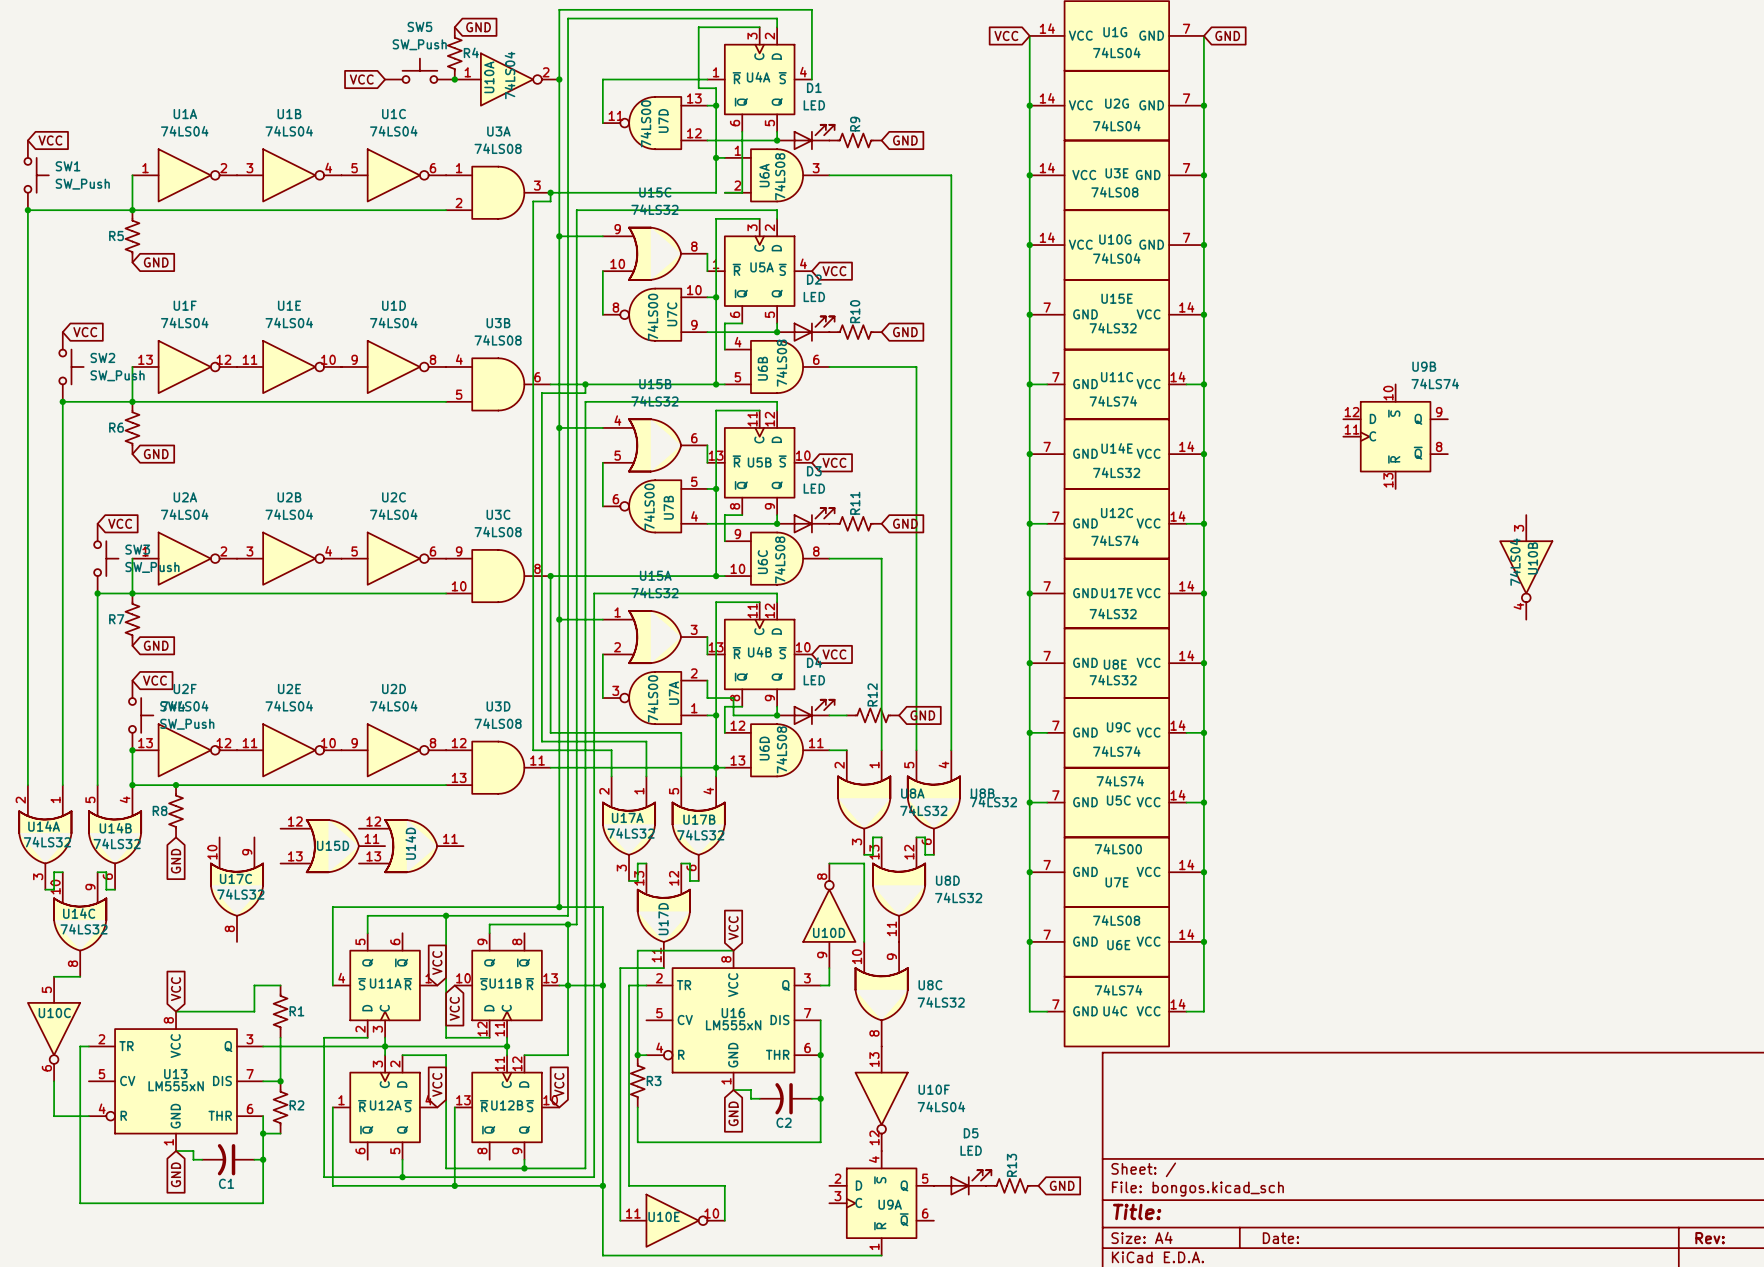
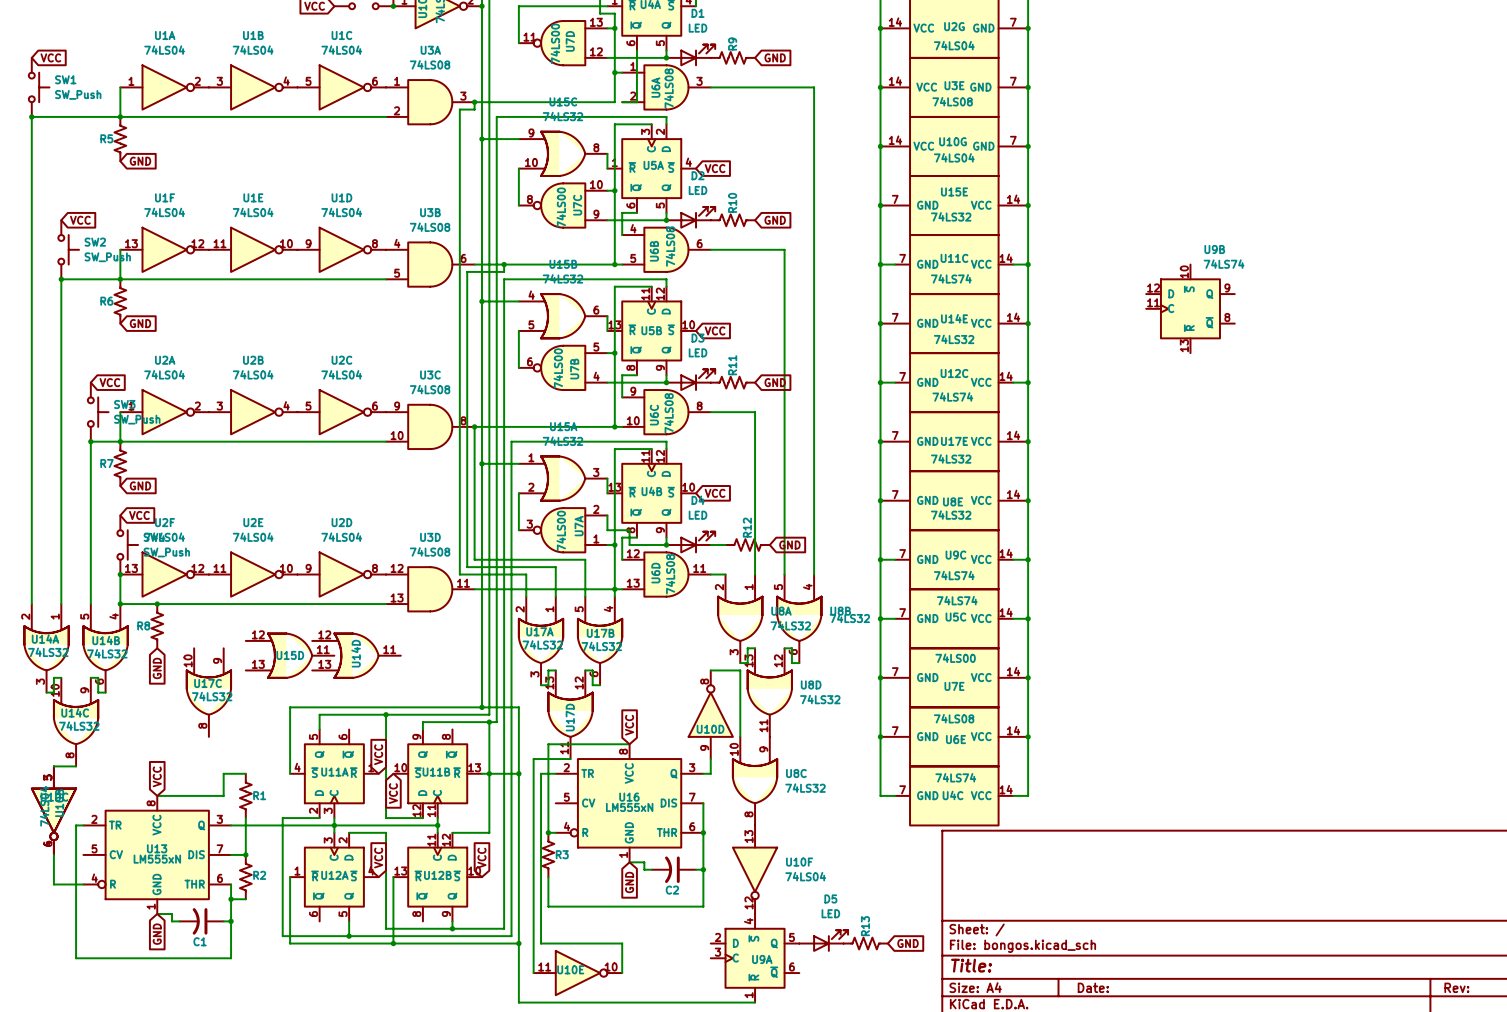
U10B position: (1526, 567) -> (53, 810)

